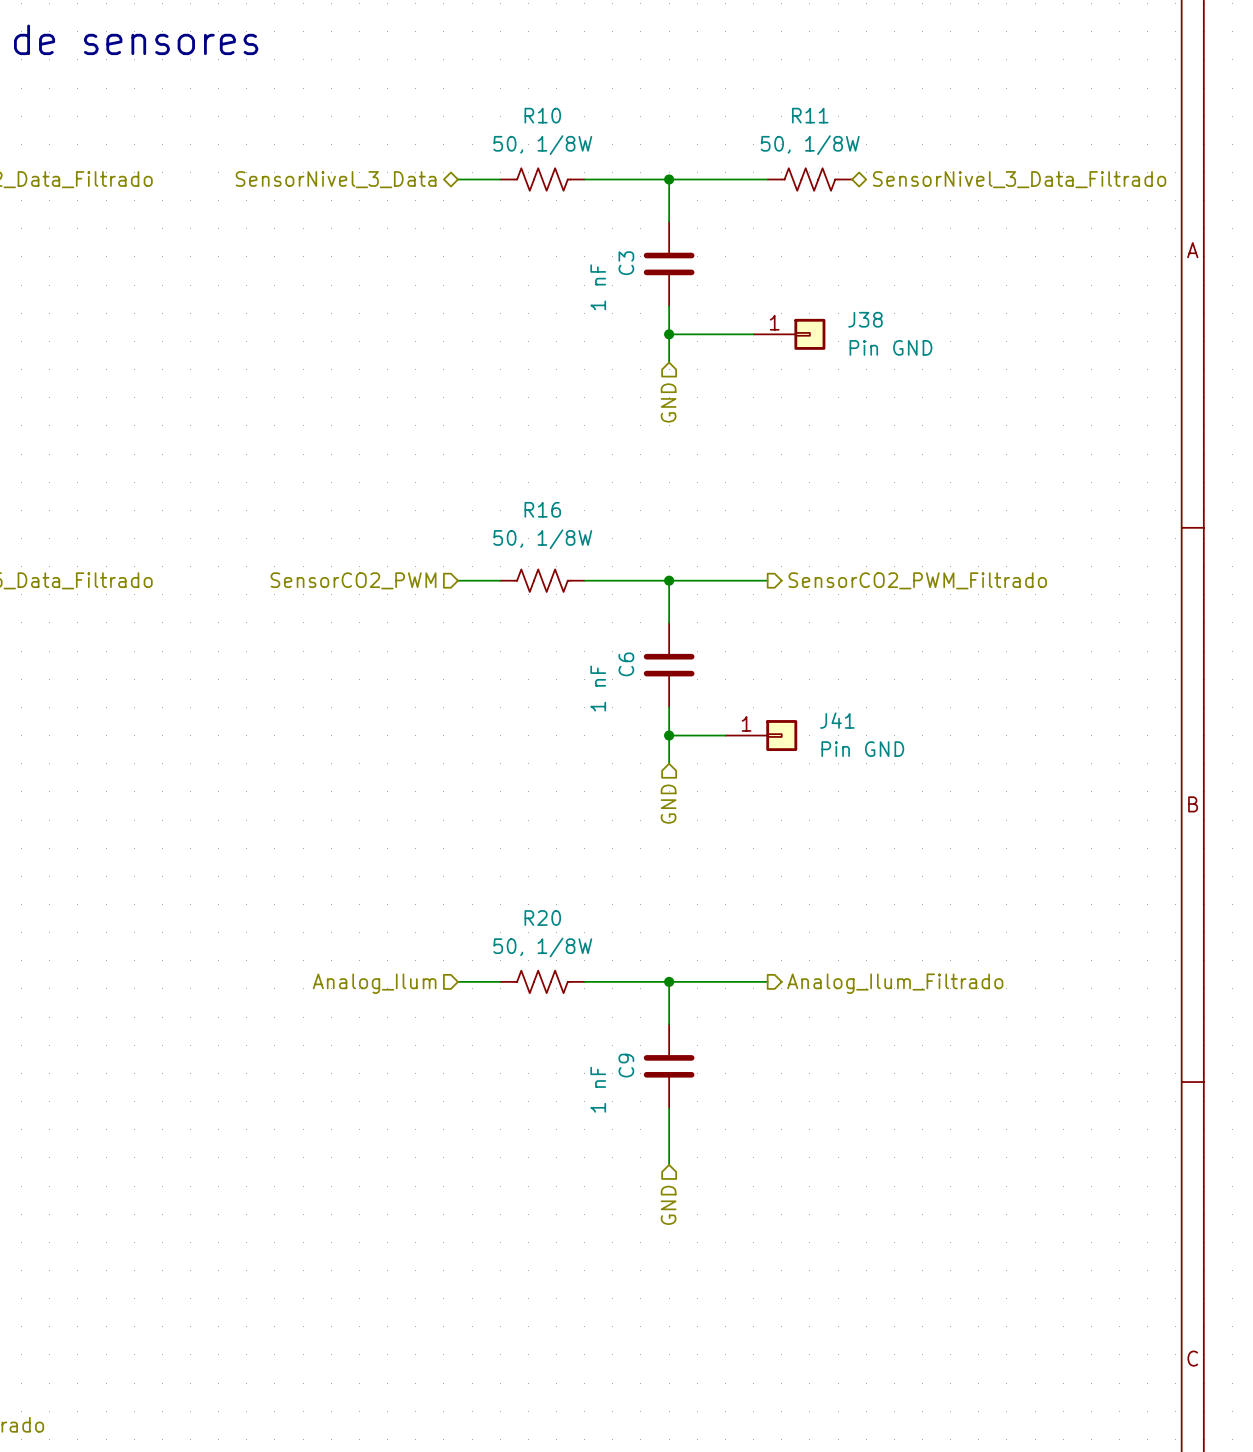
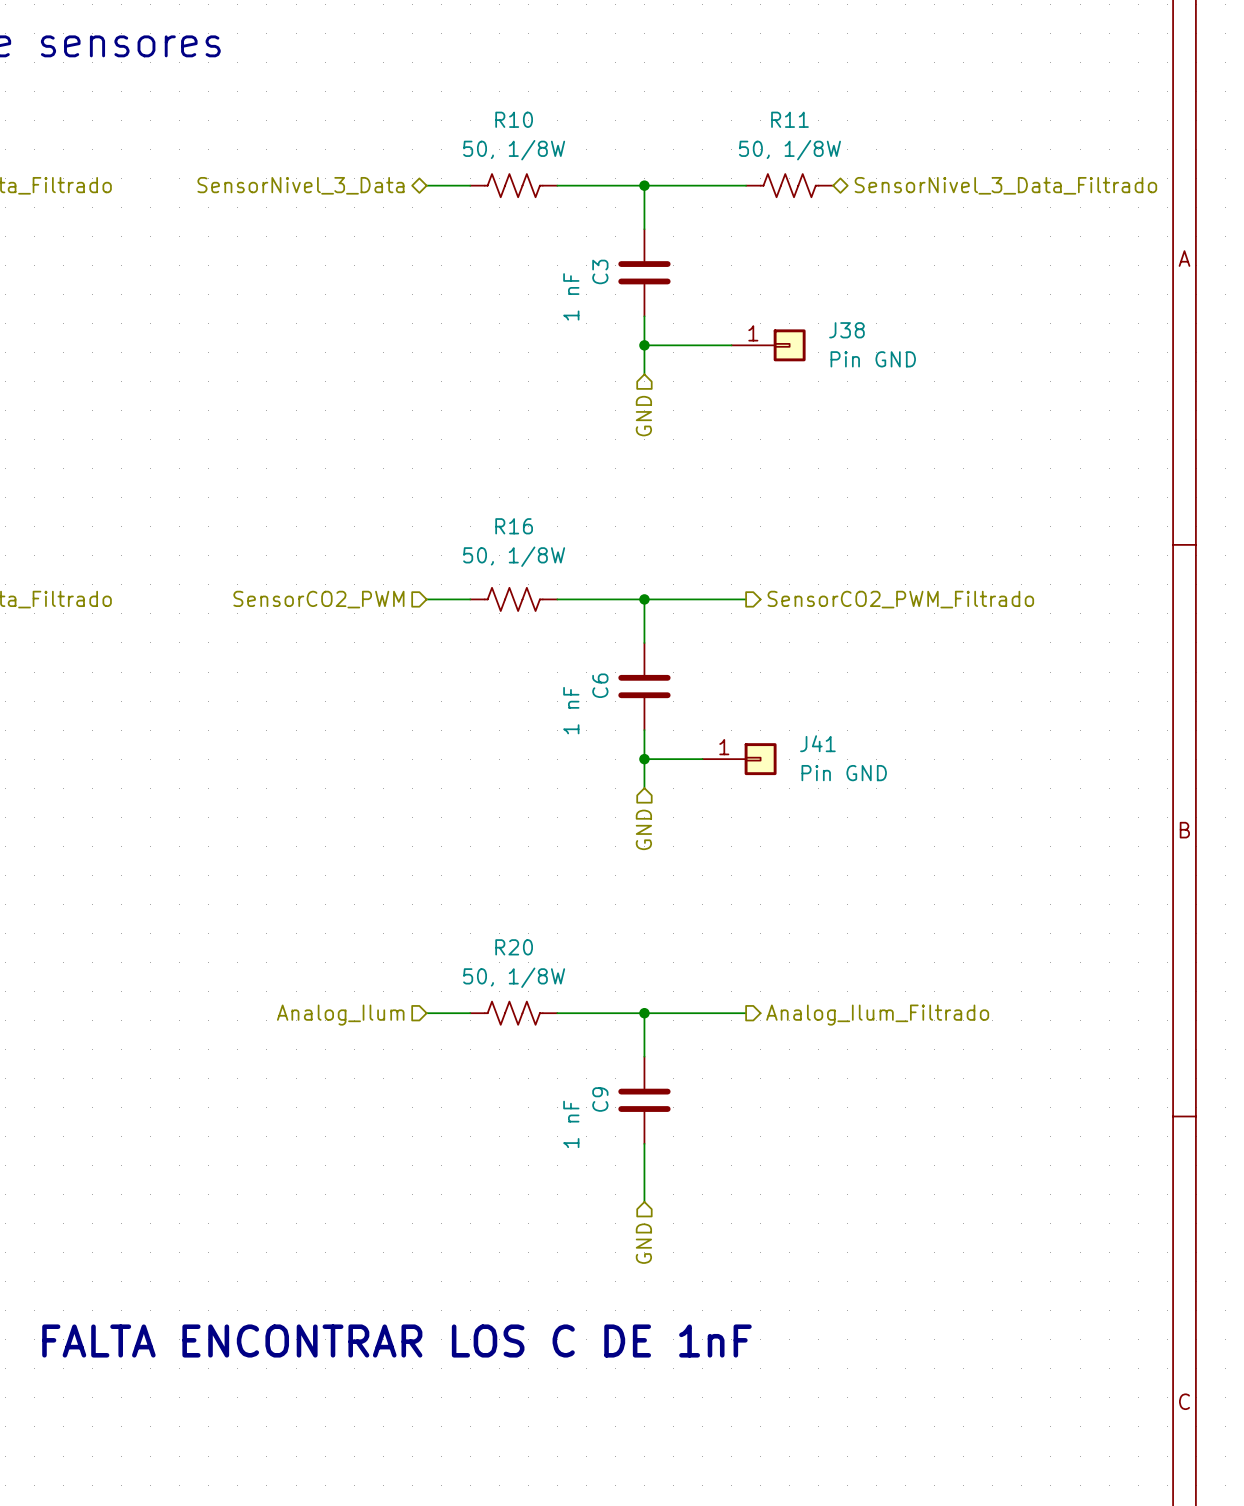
text: none -> FALTA ENCONTRAR LOS C DE 1nF (396, 1341)

